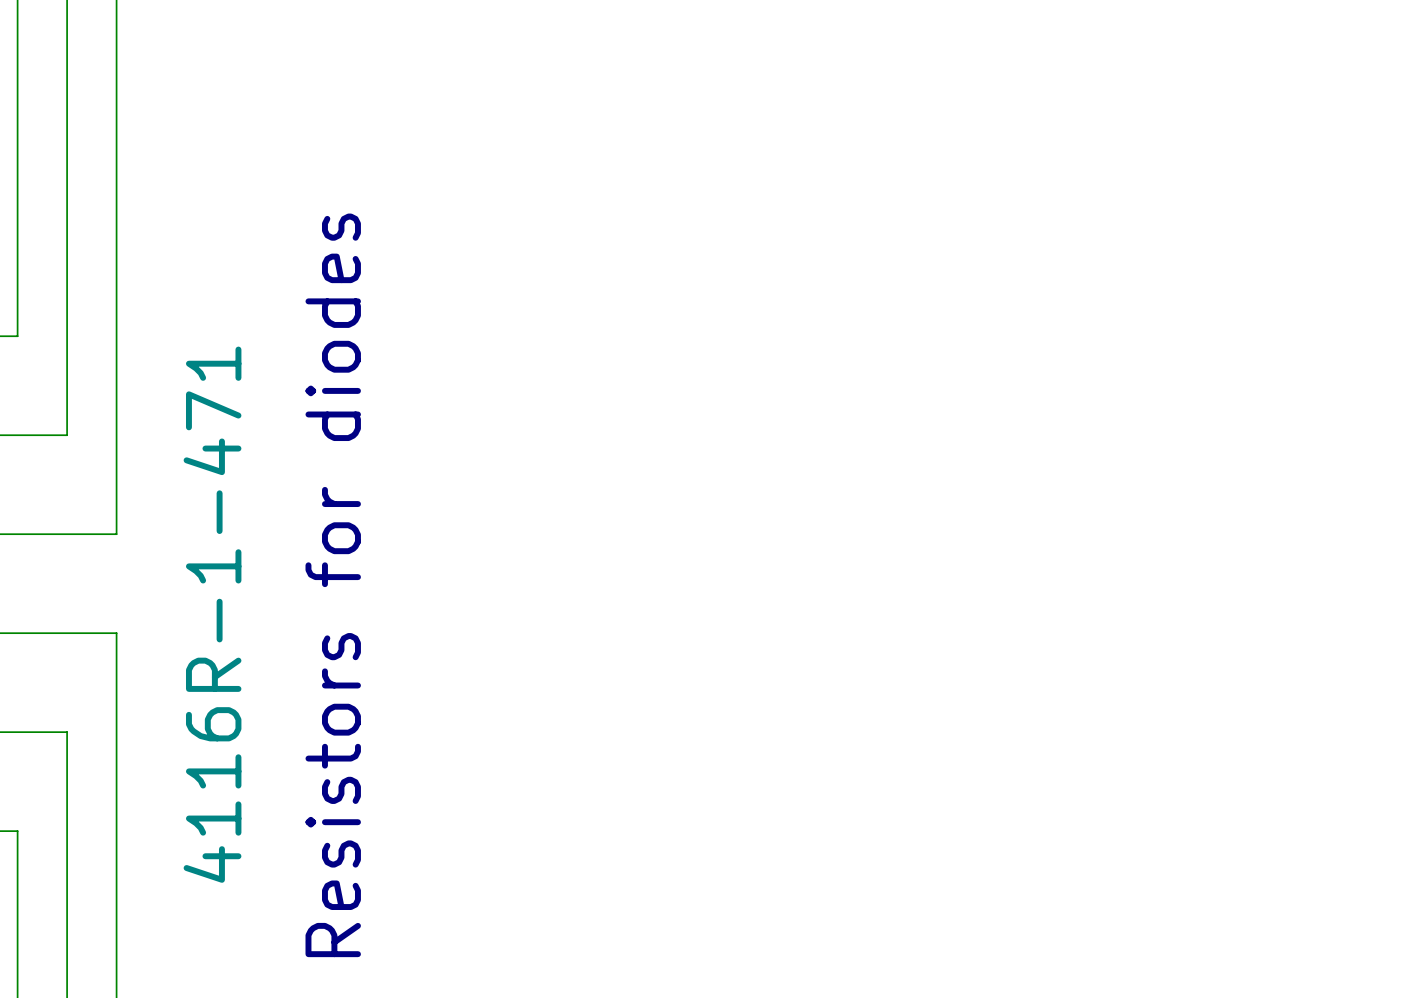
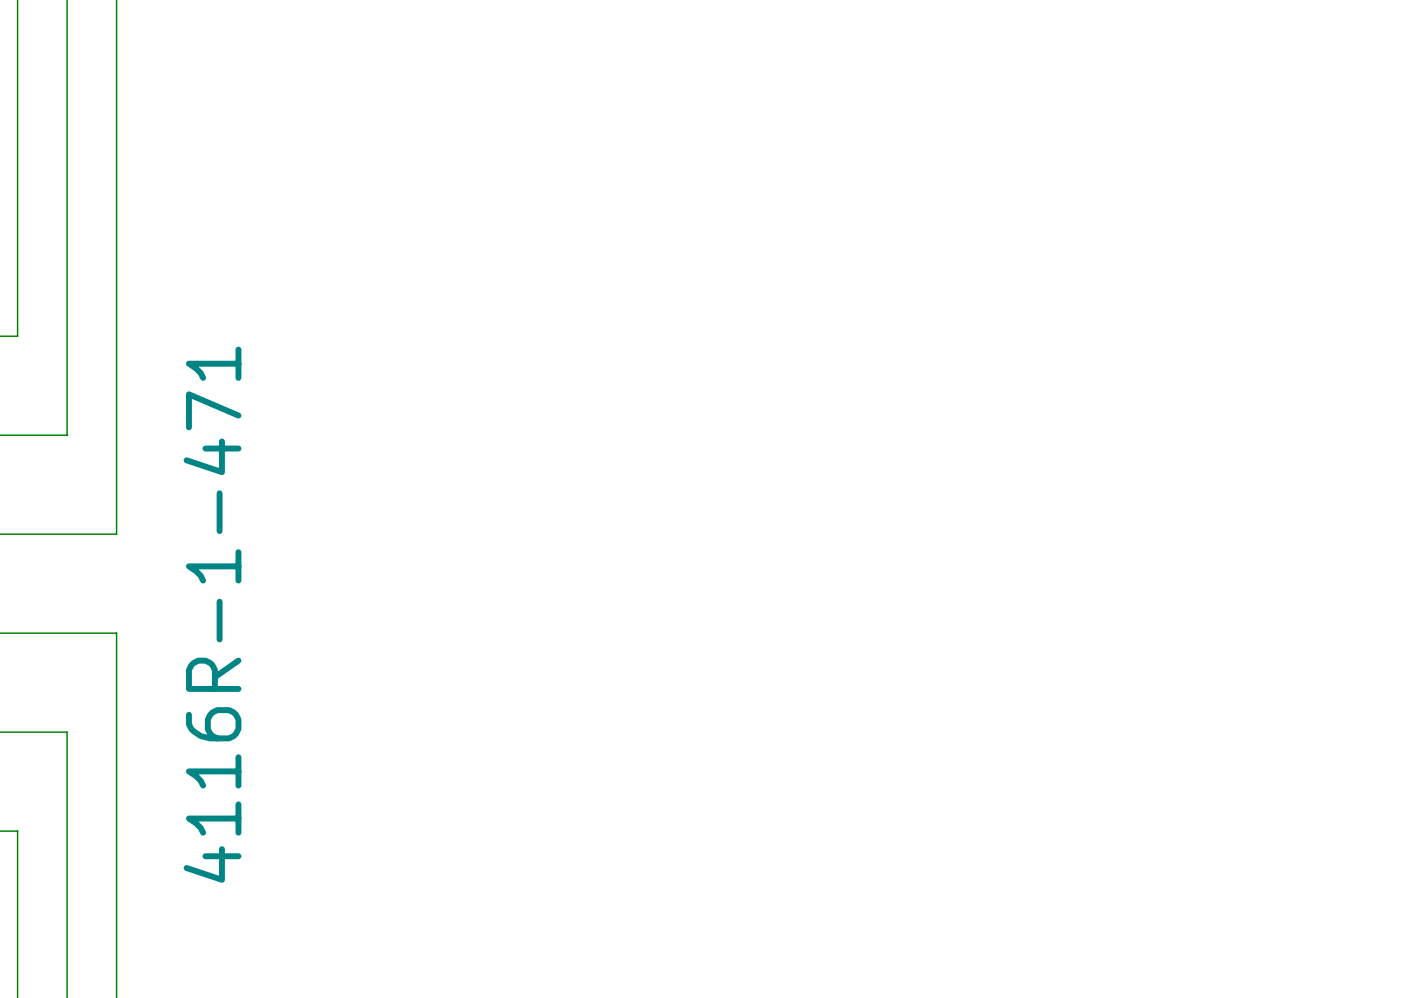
text: Resistors for diodes (333, 585) -> none

